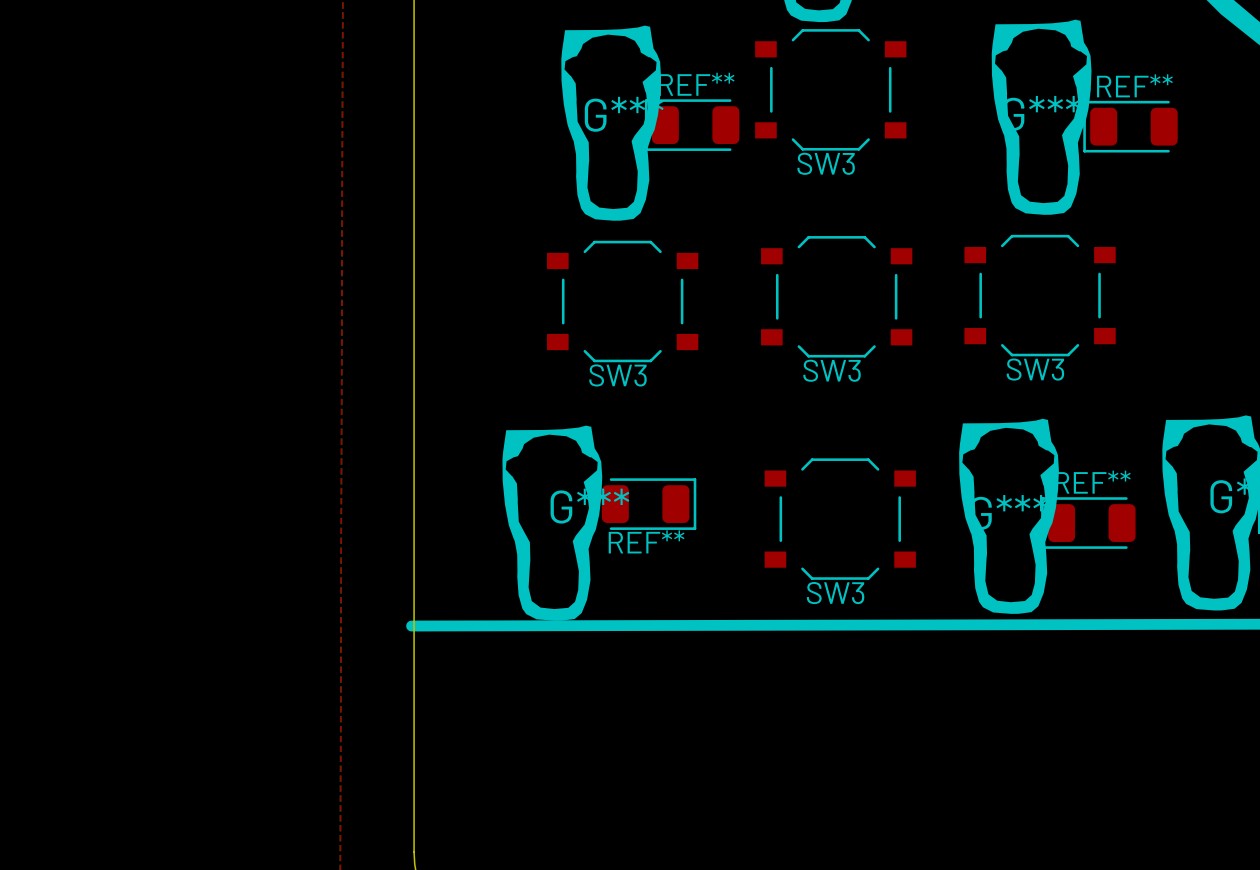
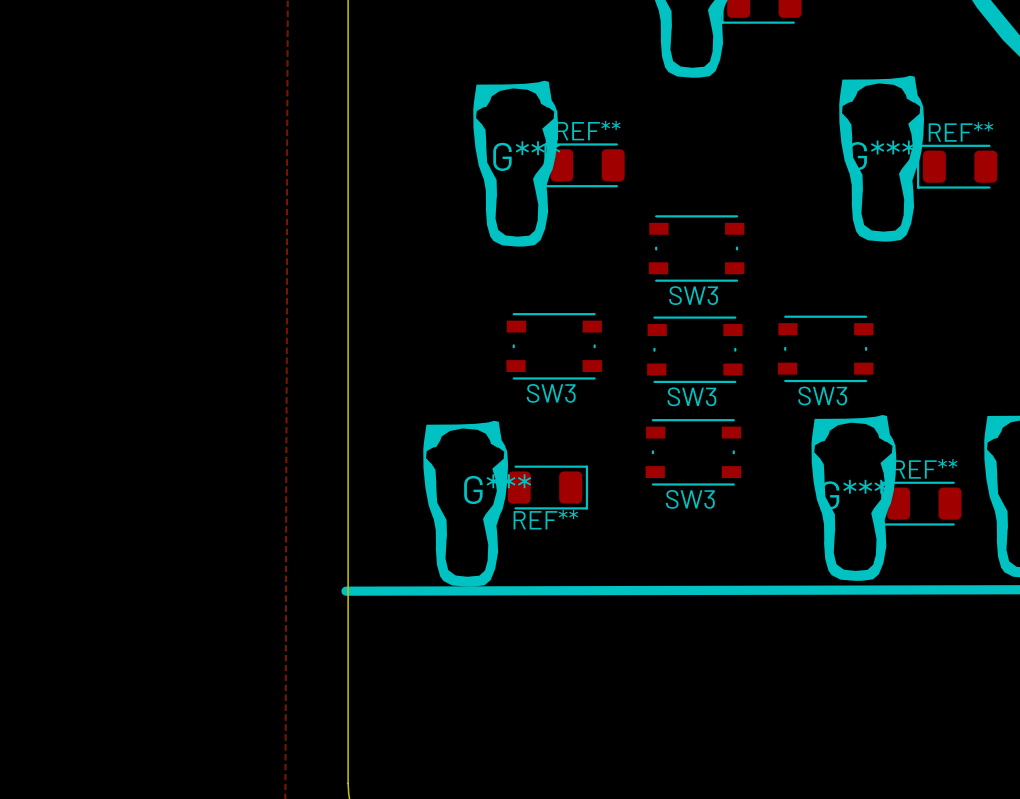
SW3: (830, 89) -> none
SW3: none -> (696, 248)
SW3: (1040, 295) -> none
SW3: (836, 296) -> none
SW3: (622, 301) -> none
SW3: none -> (554, 346)
SW3: none -> (825, 348)
SW3: none -> (694, 349)
SW3: none -> (693, 452)
SW3: (840, 519) -> none

